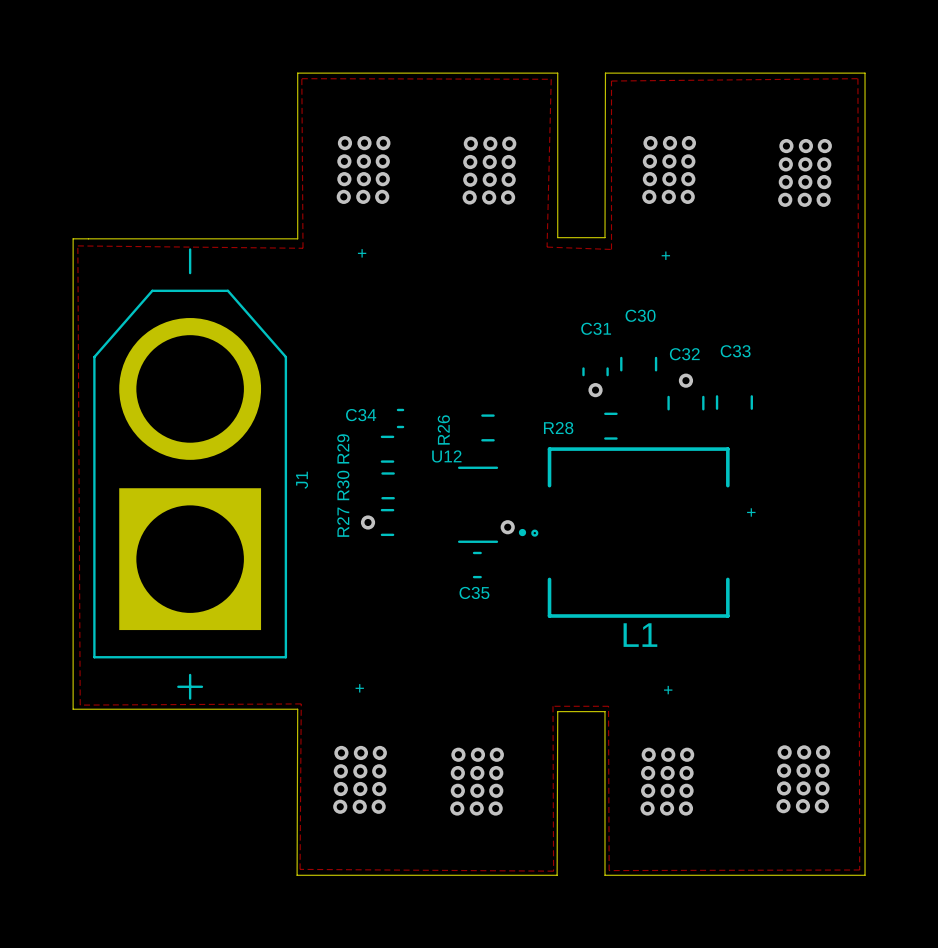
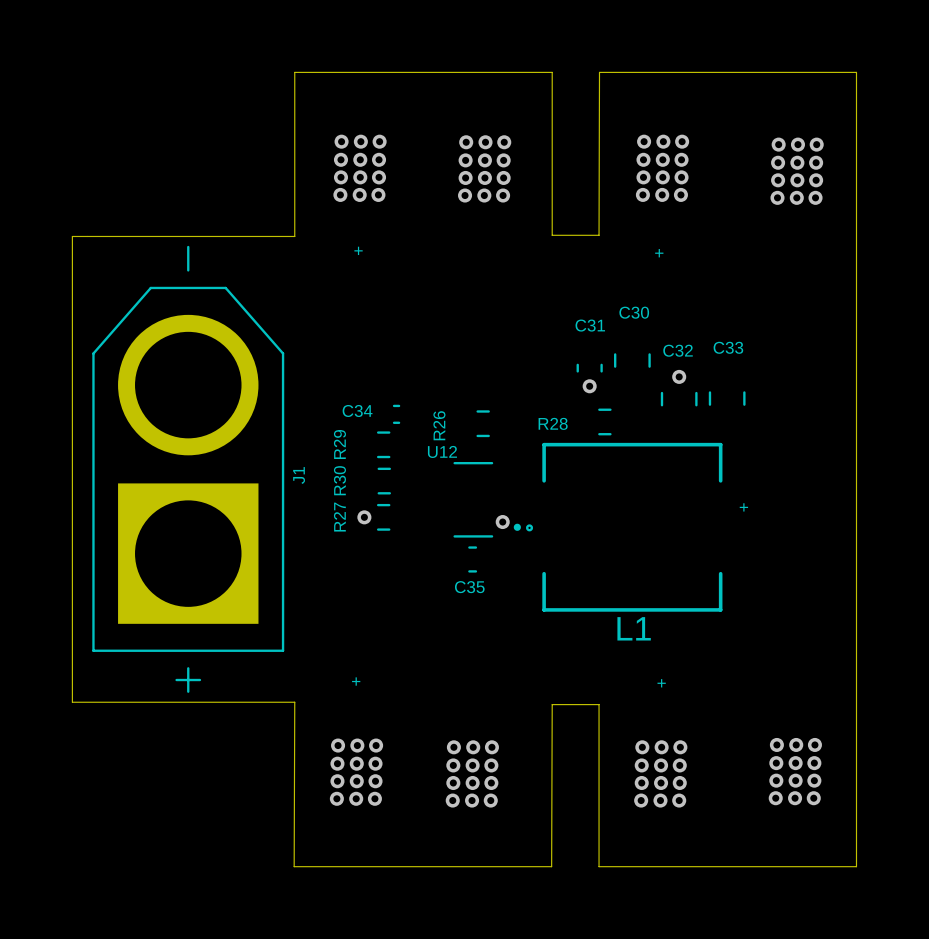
zone outline: (301, 78) (303, 248) (77, 245) (80, 705) (301, 703) (300, 869) (553, 871) (552, 706) (608, 706) (609, 870) (859, 869) (857, 78) (611, 81) (611, 249) (547, 247) (551, 79) (301, 78) -> none

